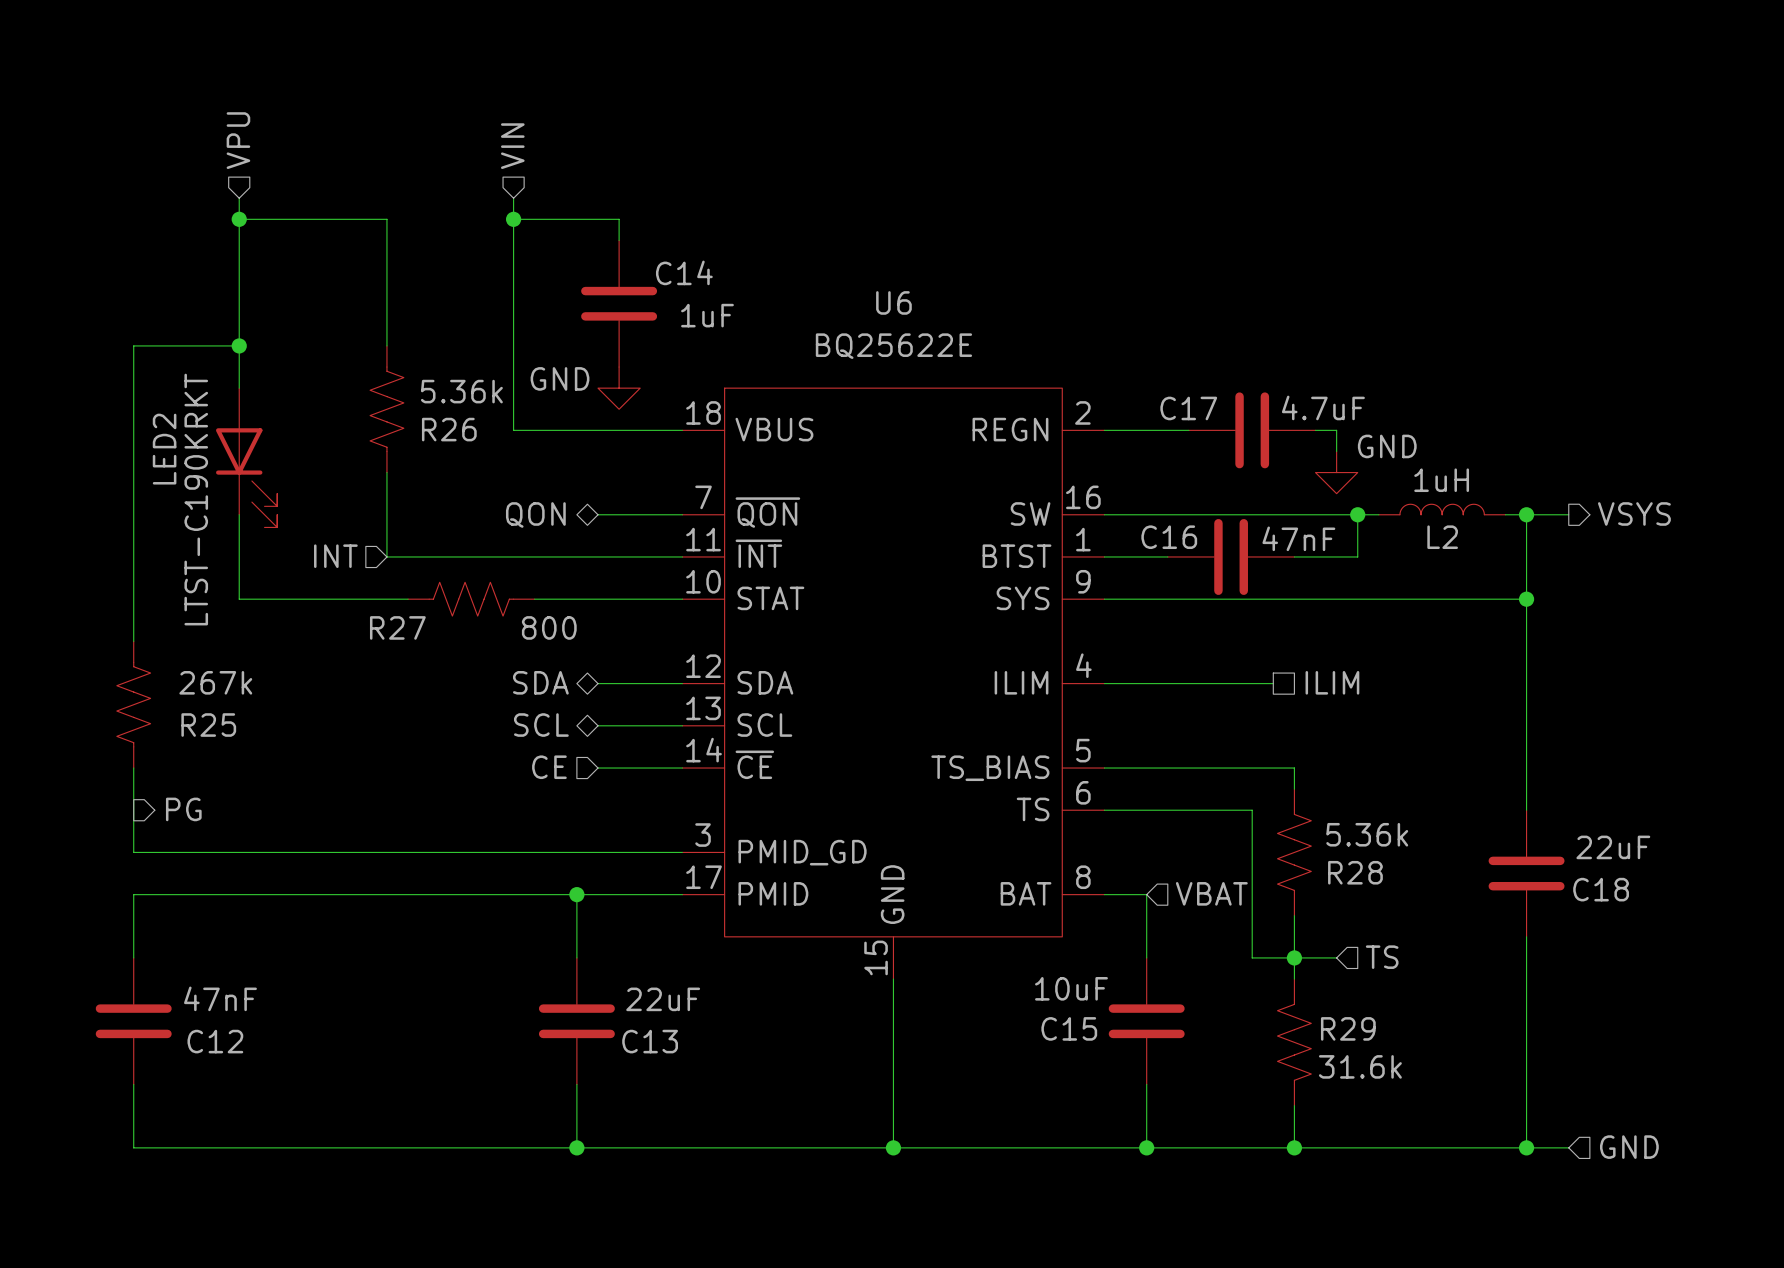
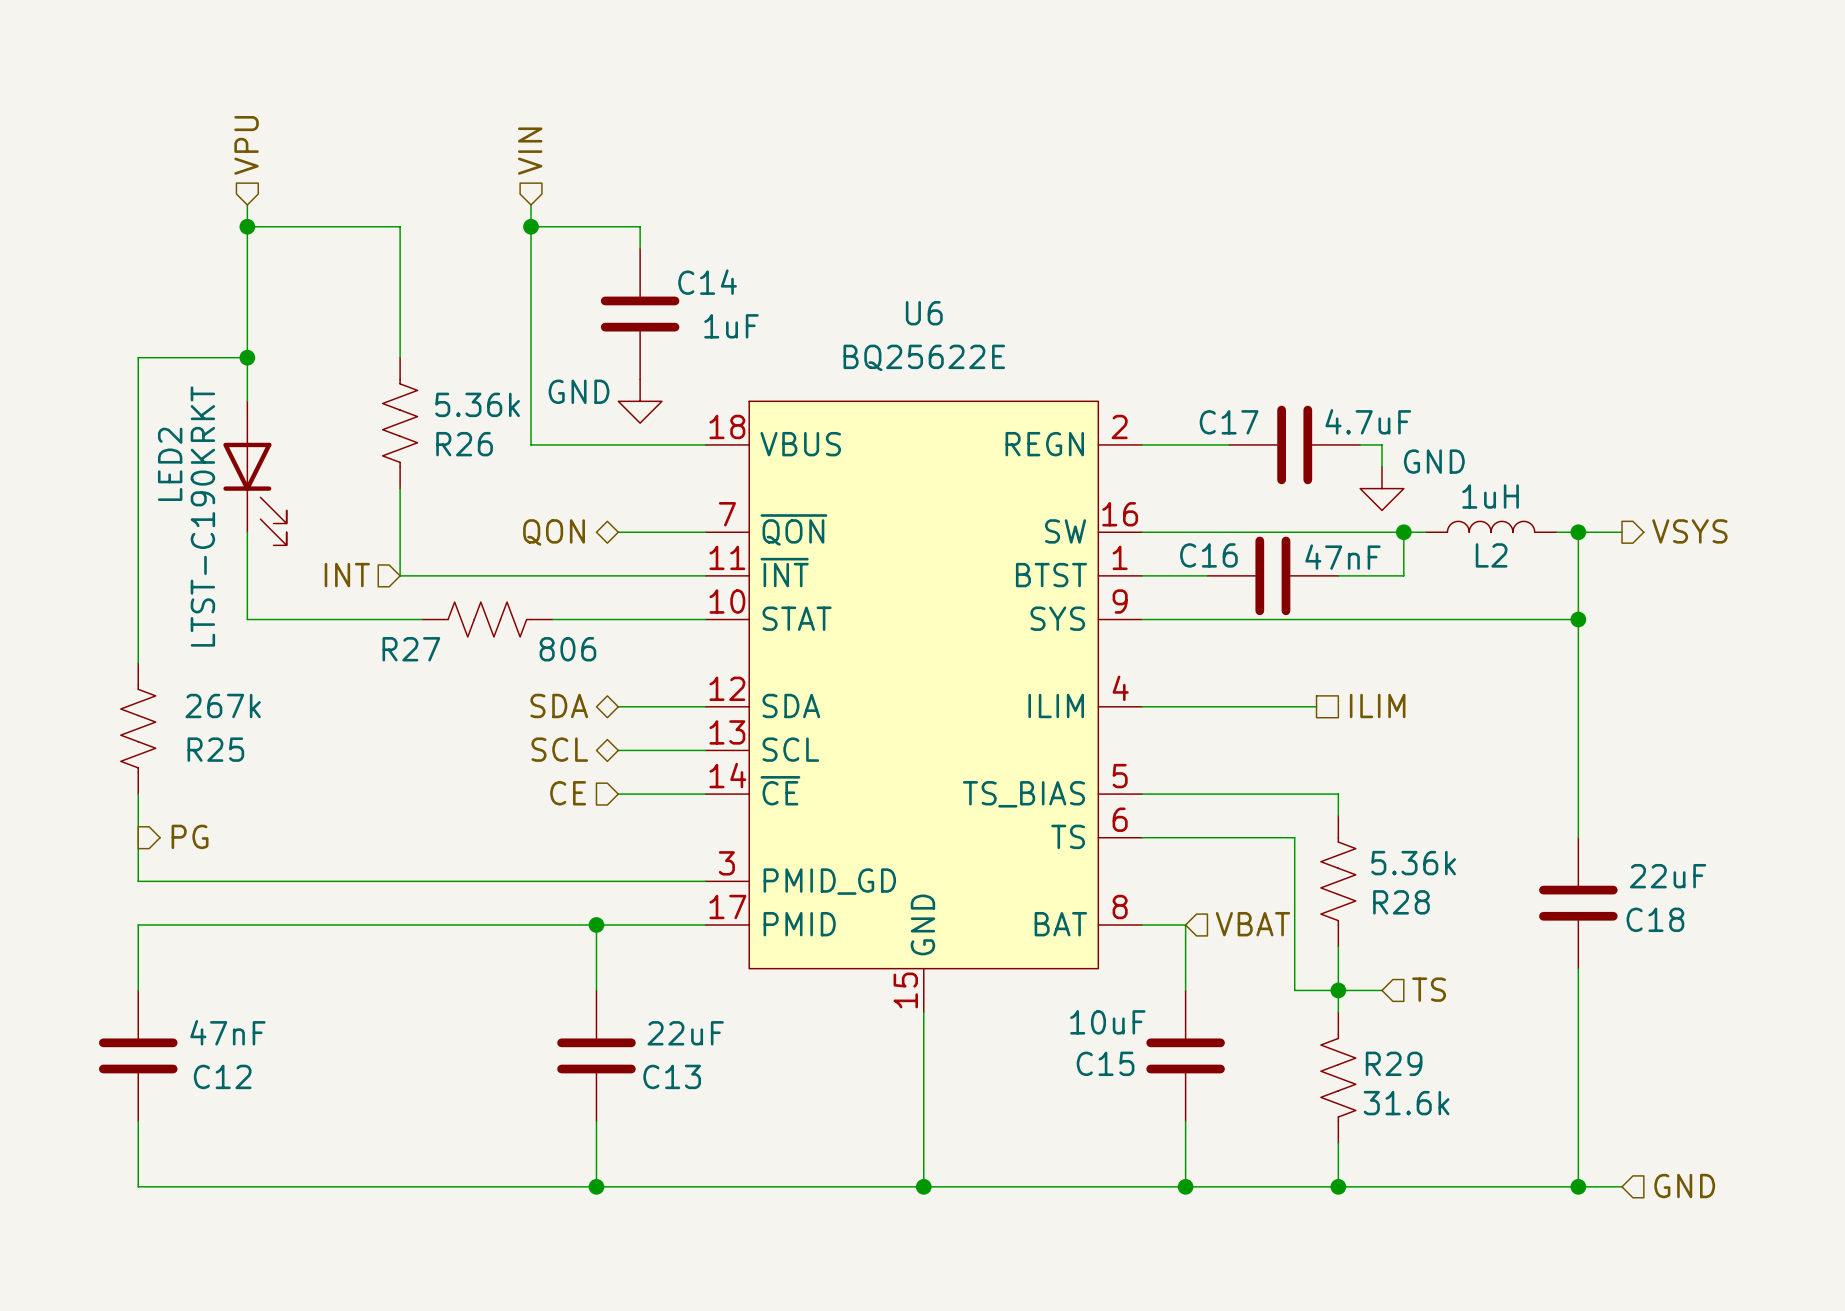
R27 value: 800 (549, 627) -> 806 (567, 649)

